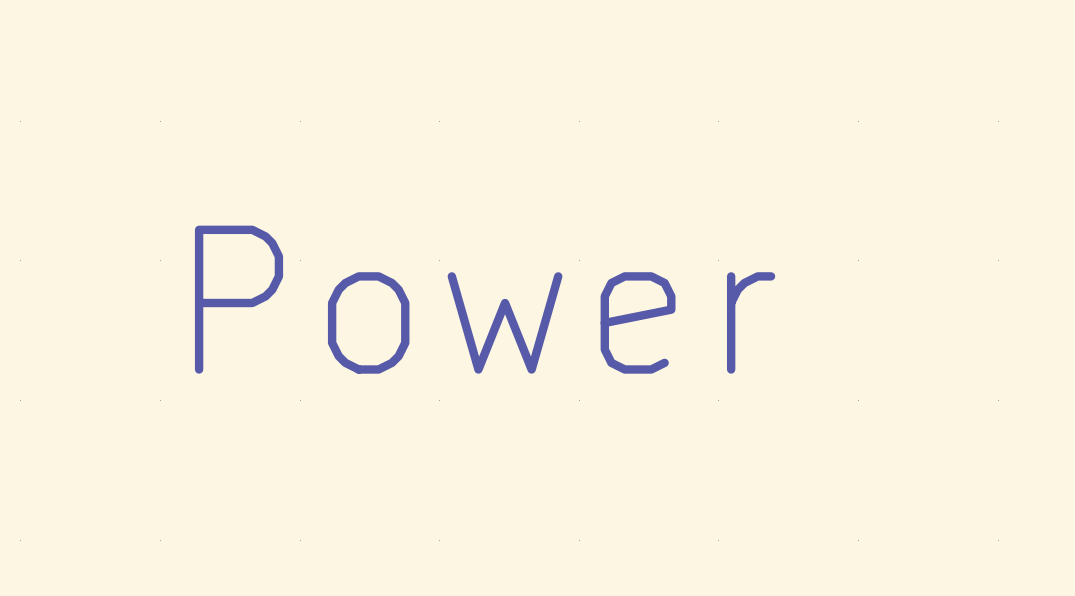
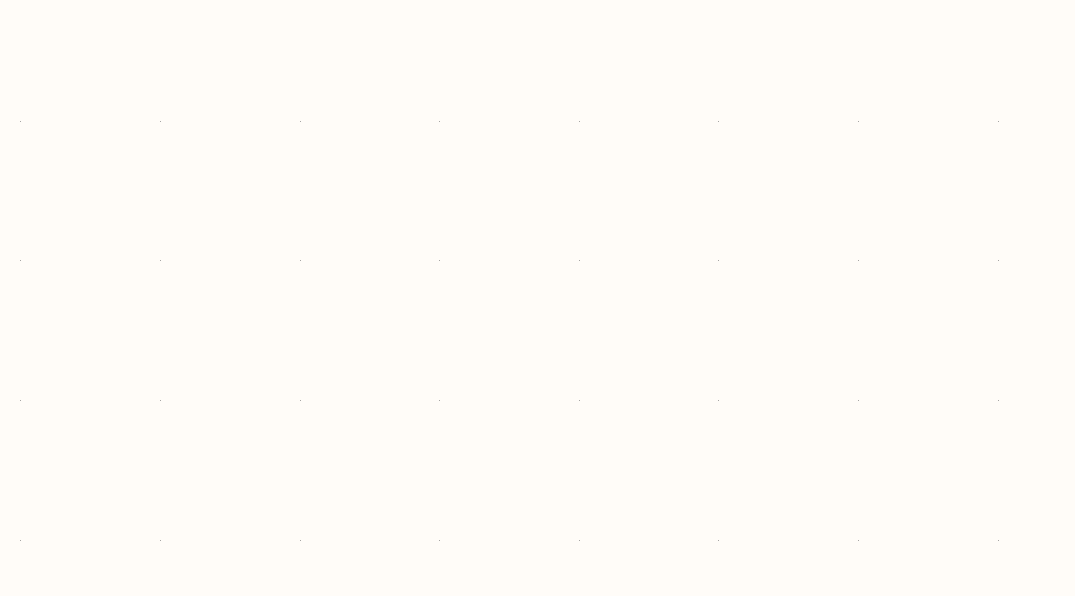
text: Power (485, 299) -> none

